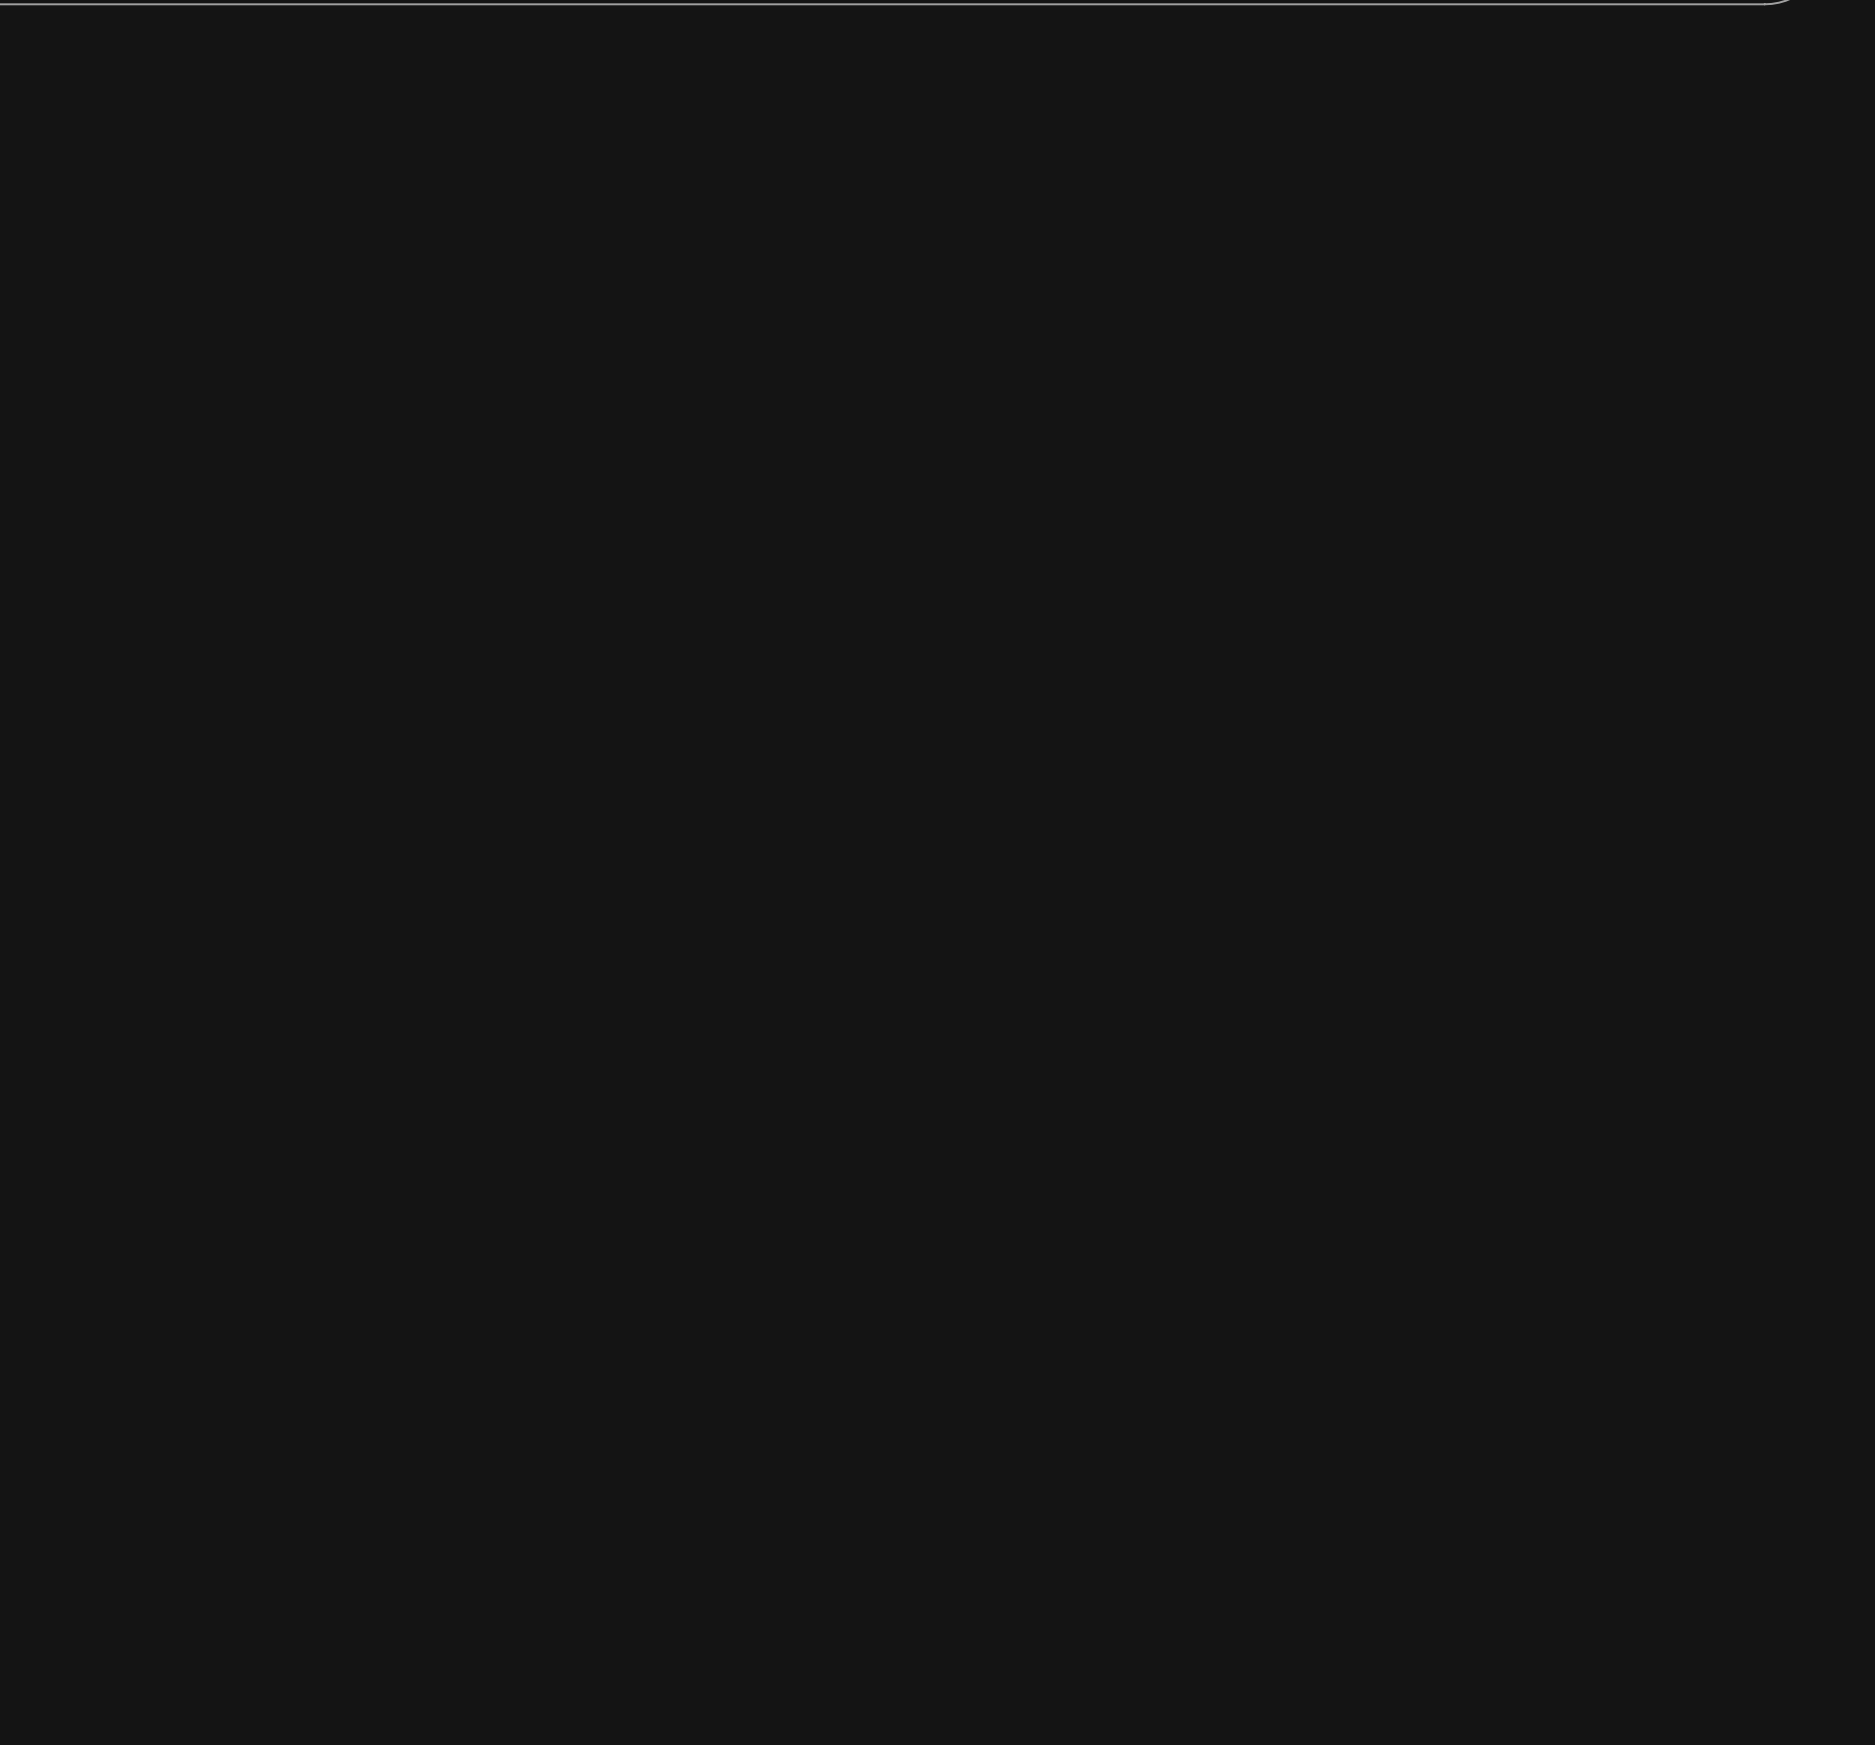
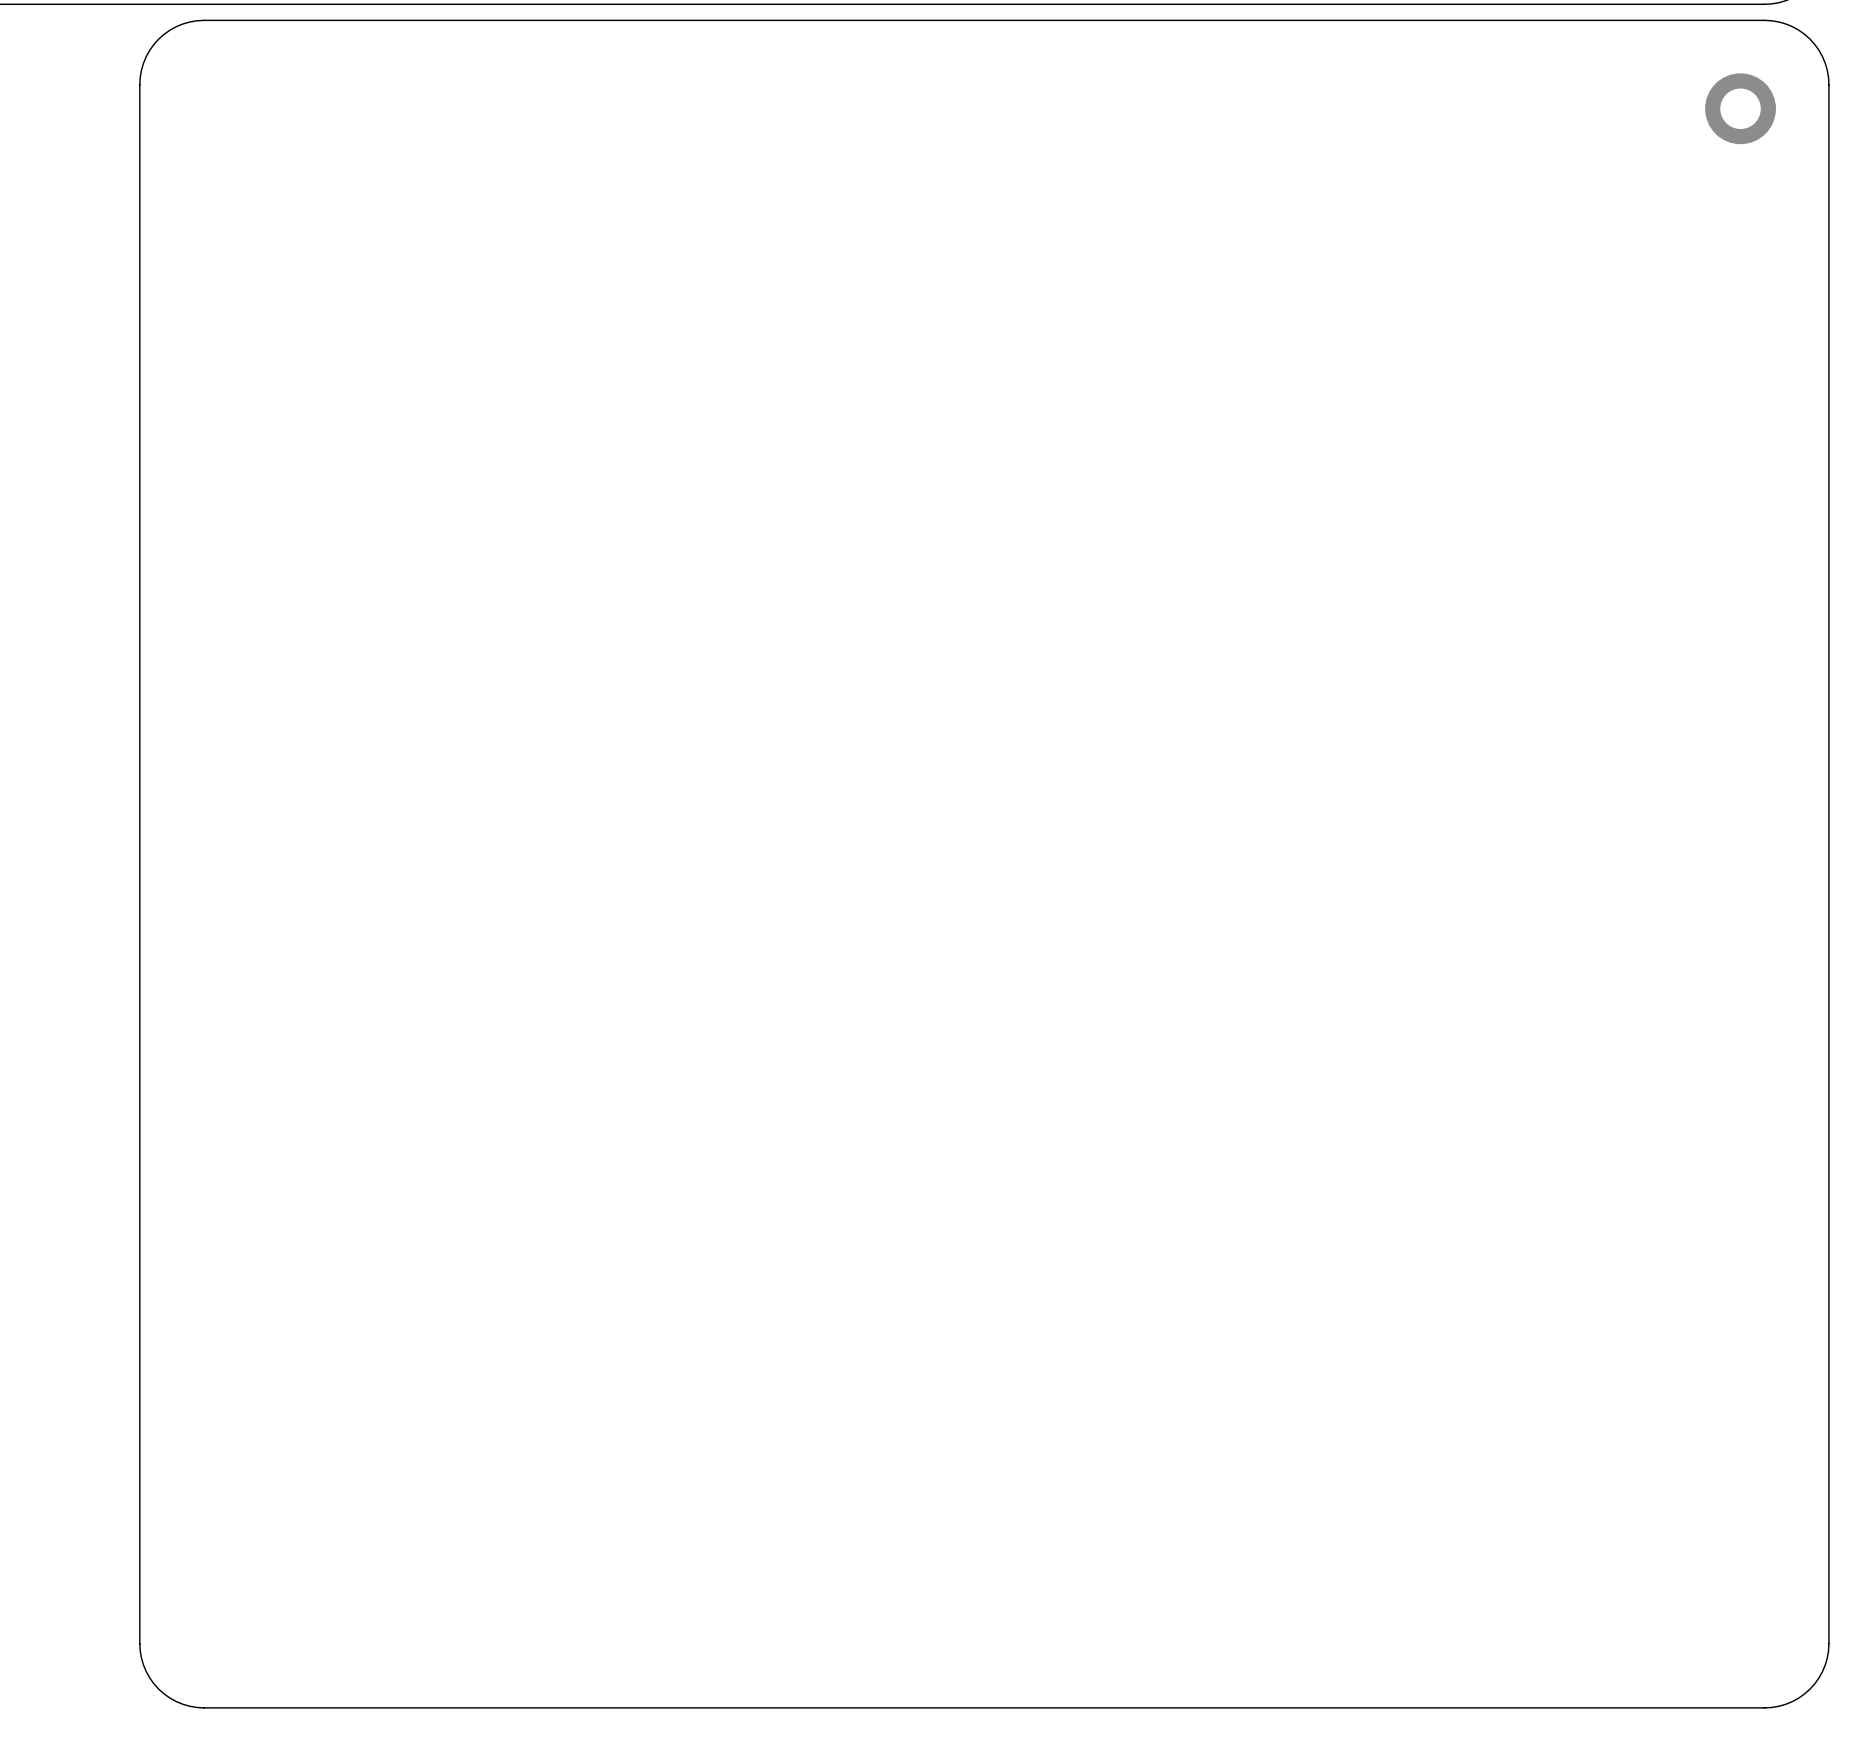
board edge: none -> (1764, 20) (204, 20) (189, 21) (176, 26) (158, 39) (149, 50) (143, 63) (139, 84) (139, 1643) (143, 1664) (149, 1677) (158, 1689) (176, 1701) (189, 1706) (204, 1707) (1764, 1707) (1778, 1706) (1792, 1701) (1810, 1689) (1822, 1671) (1827, 1657) (1828, 1643) (1828, 84) (1827, 70) (1822, 56) (1810, 39) (1798, 30) (1785, 23) (1764, 20)
part: none -> (1740, 108)

